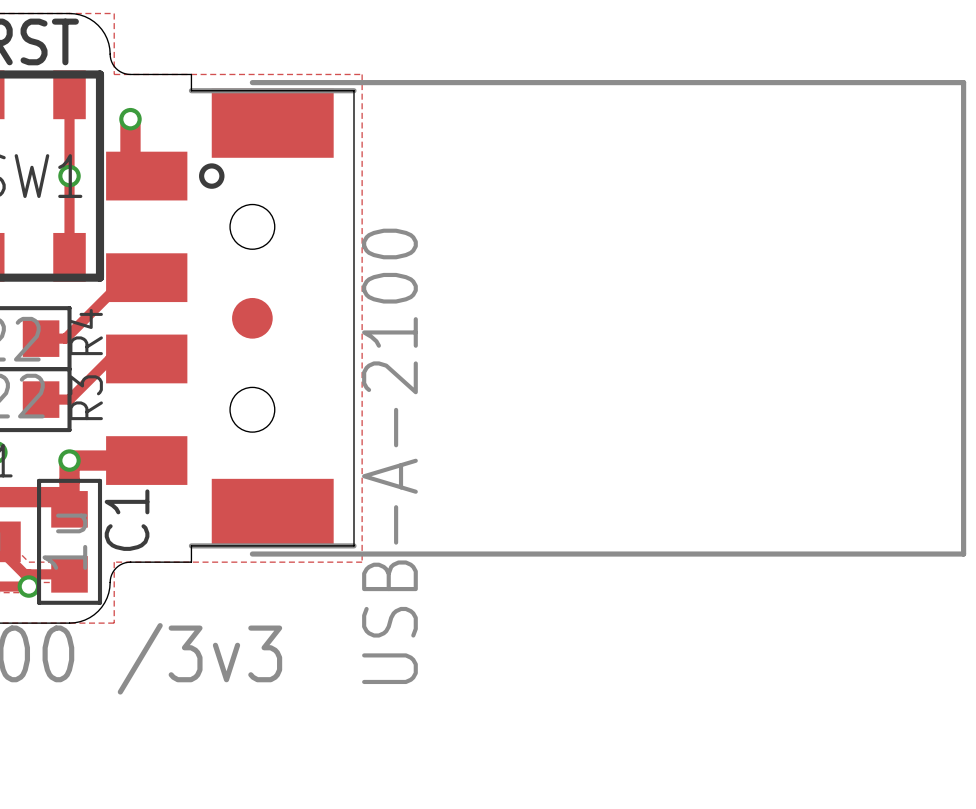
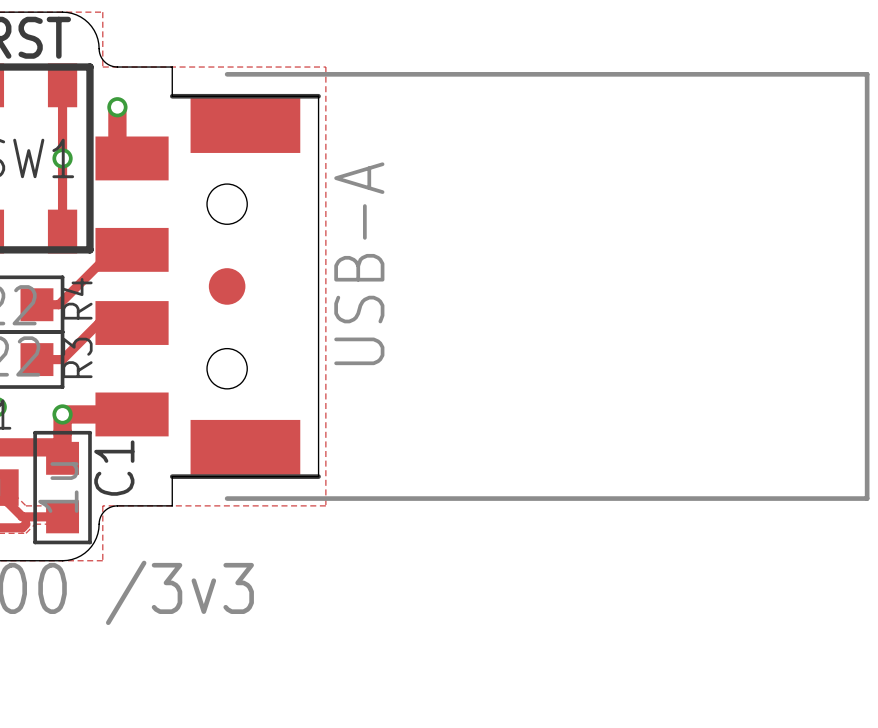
part footprint: [106, 80, 967, 557] -> [95, 72, 870, 501]
board edge: (191, 90) (354, 90) (354, 106) -> (172, 81) (172, 96) (318, 96)
part value: USB-A-2100 (389, 456) -> USB-A (359, 263)
board edge: (354, 529) (354, 545) (191, 545) -> (318, 476) (172, 476) (172, 491)
via: (28, 586) -> none

